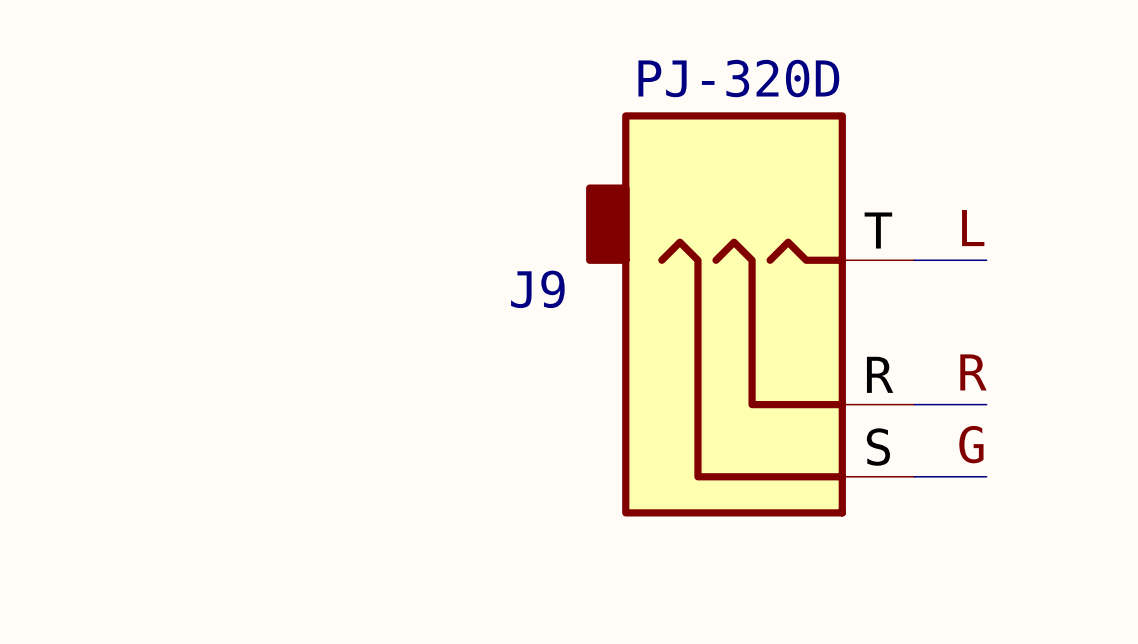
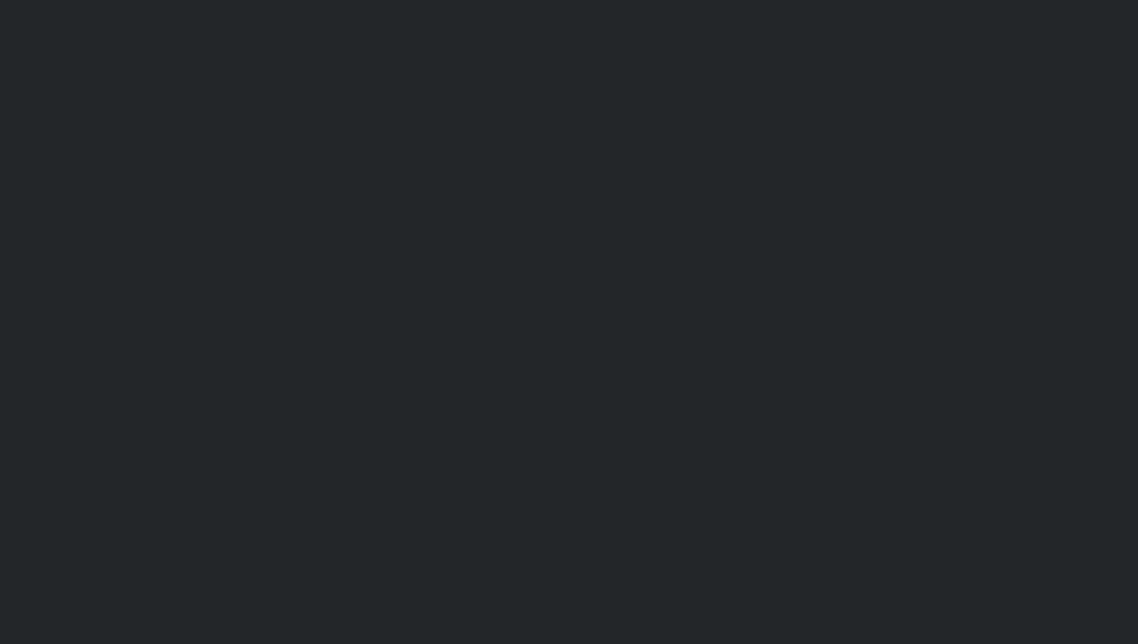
label: L (973, 228) -> none
wire: (914, 260) (986, 260) -> none
J9: PJ-320D (750, 314) -> none
label: R (973, 372) -> none
wire: (914, 404) (986, 404) -> none
label: G (971, 444) -> none
wire: (914, 476) (986, 476) -> none

